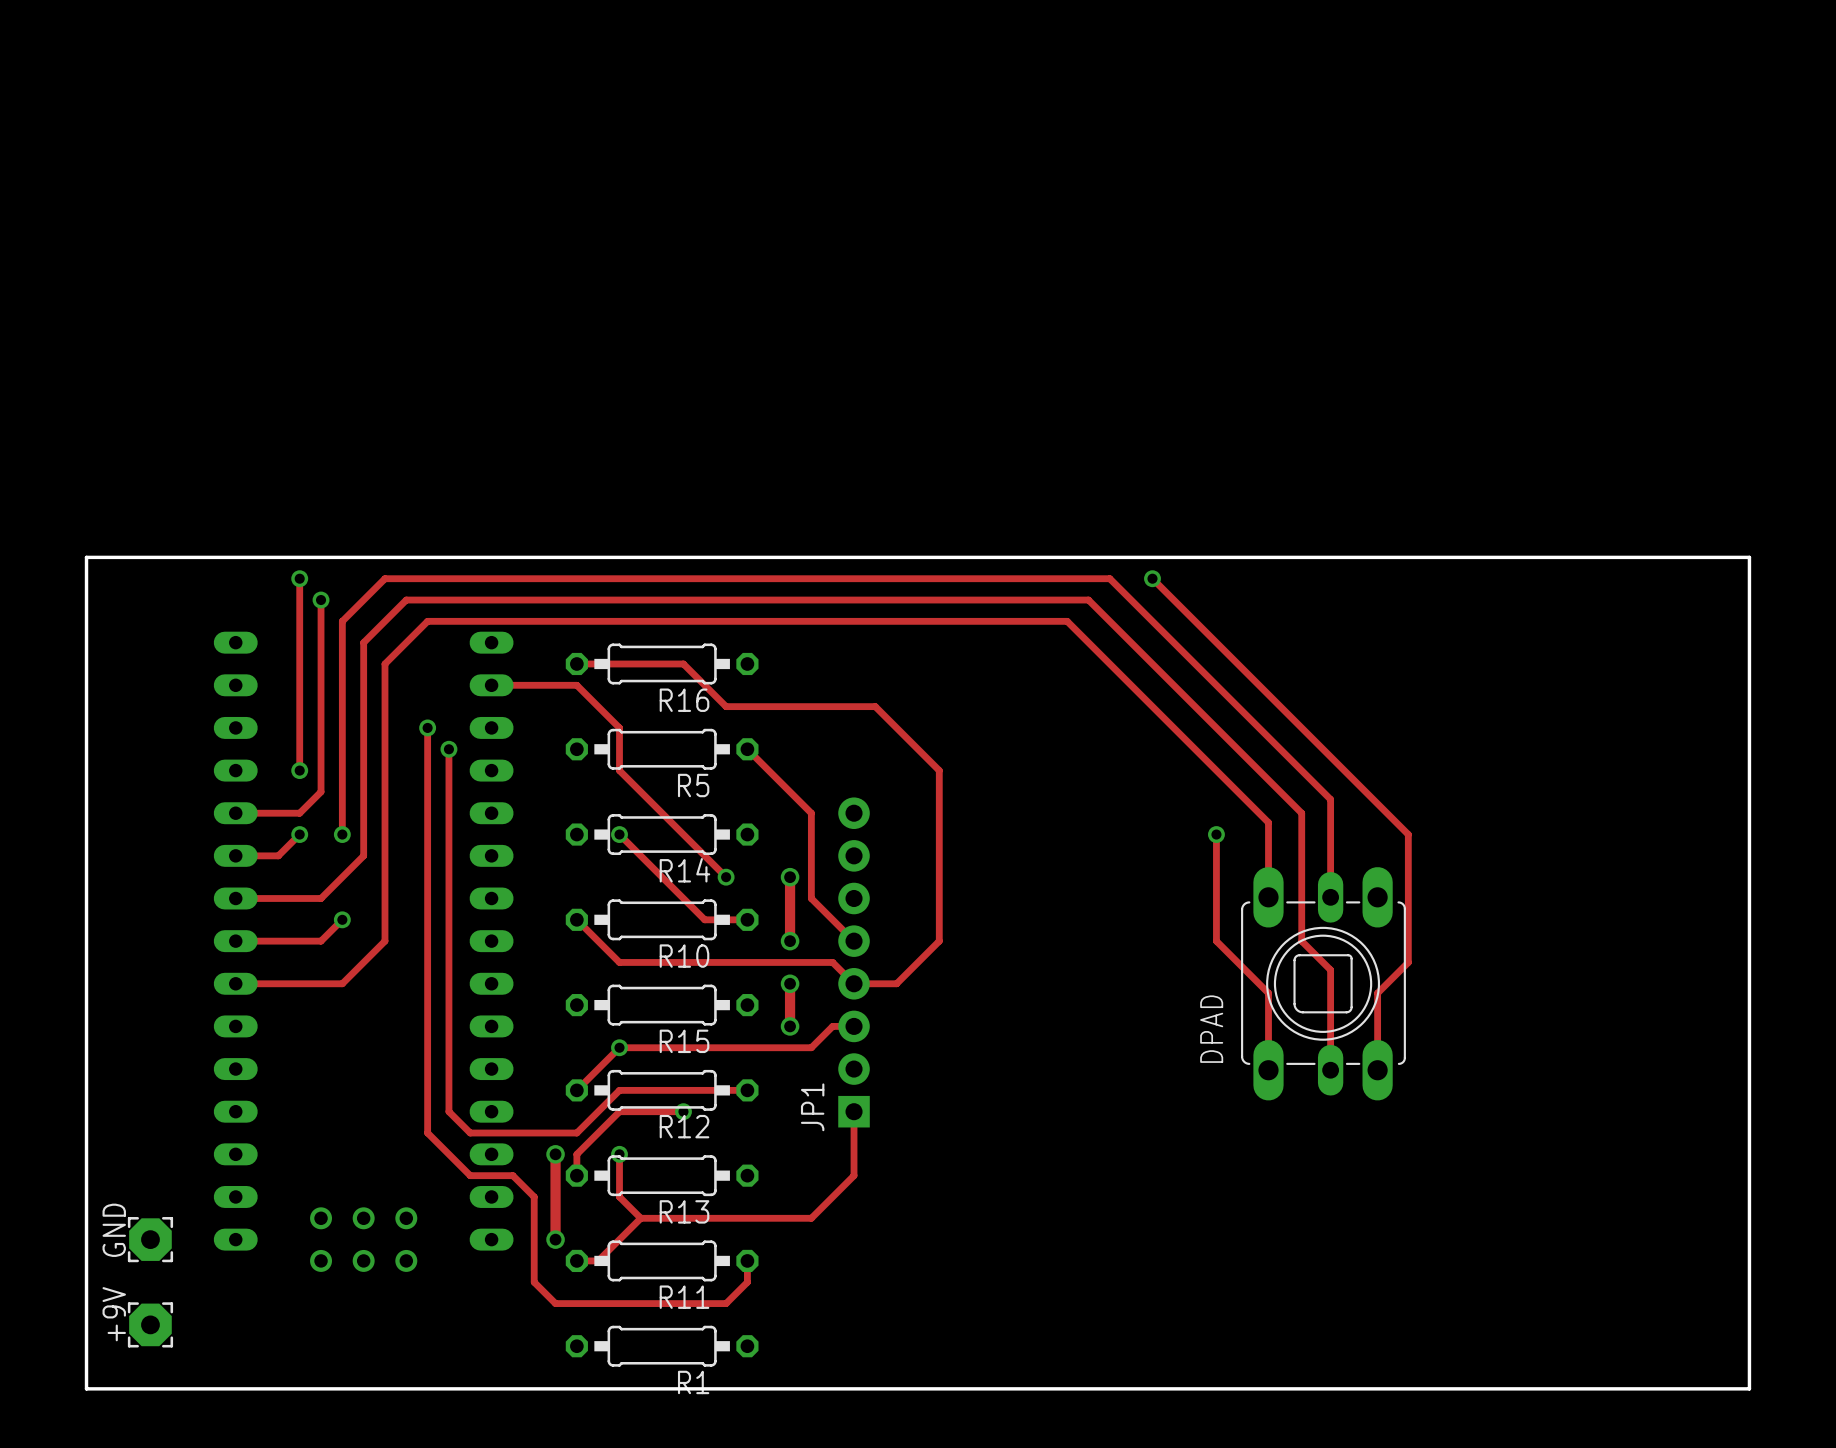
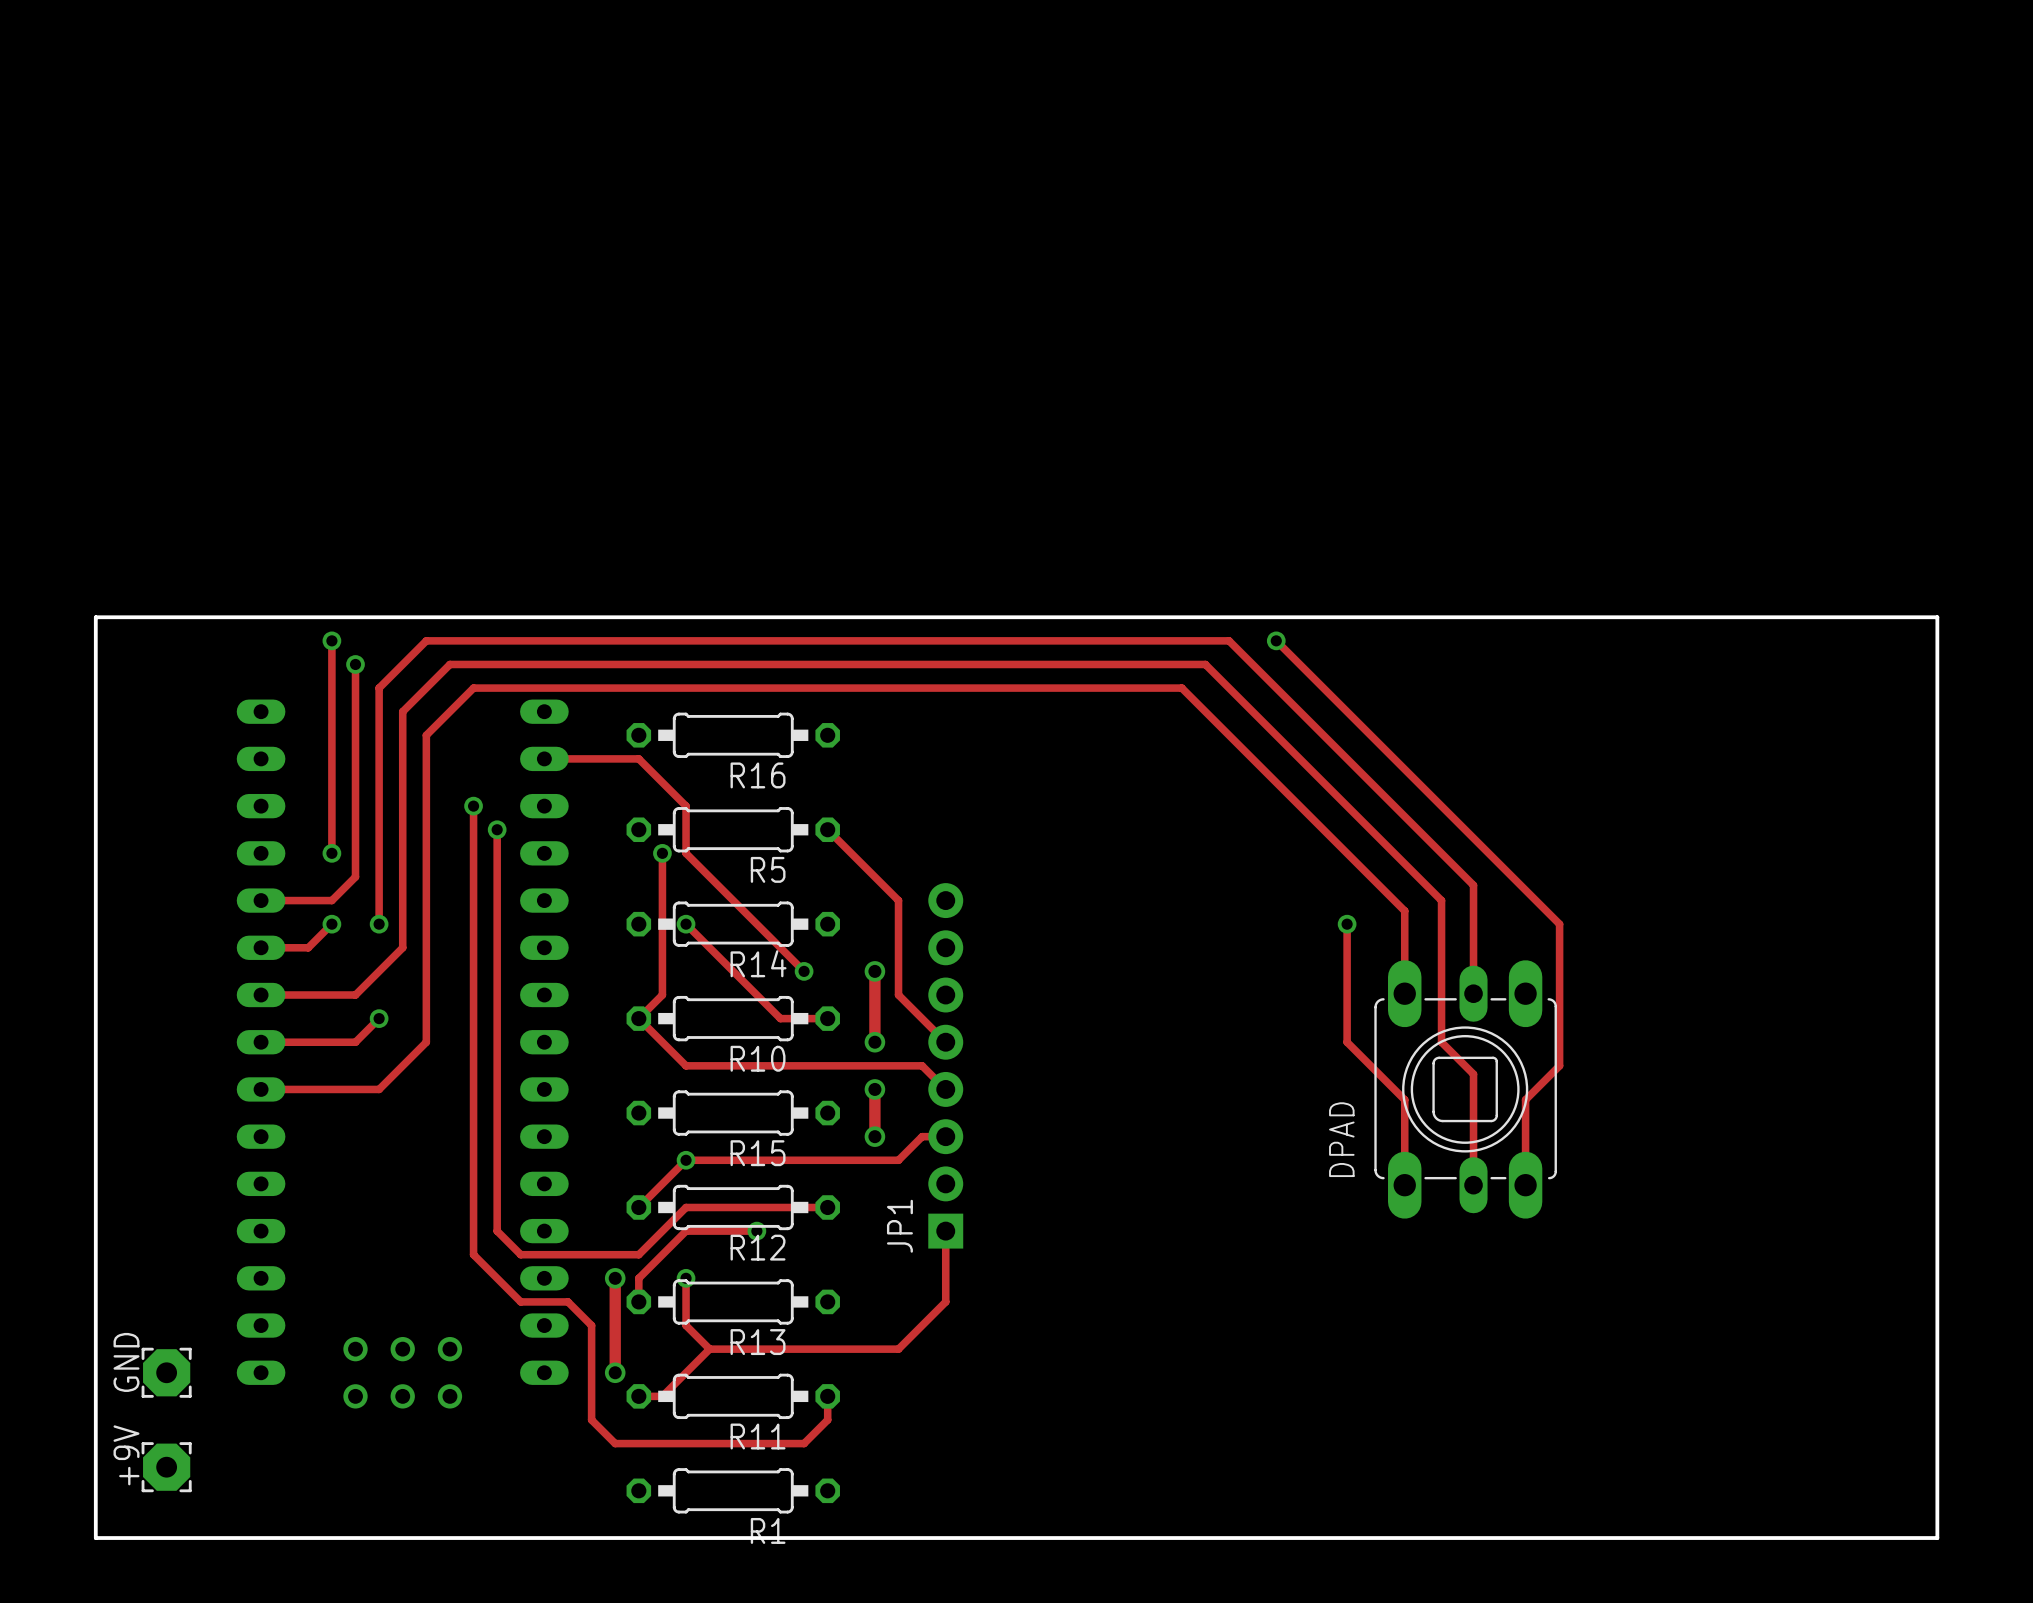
track: (576, 663) (683, 663) (726, 706) (875, 706) (939, 770) (939, 941) (896, 983) (854, 983) -> none
track: none -> (662, 853) (662, 995) (638, 1018)
via: none -> (662, 853)

